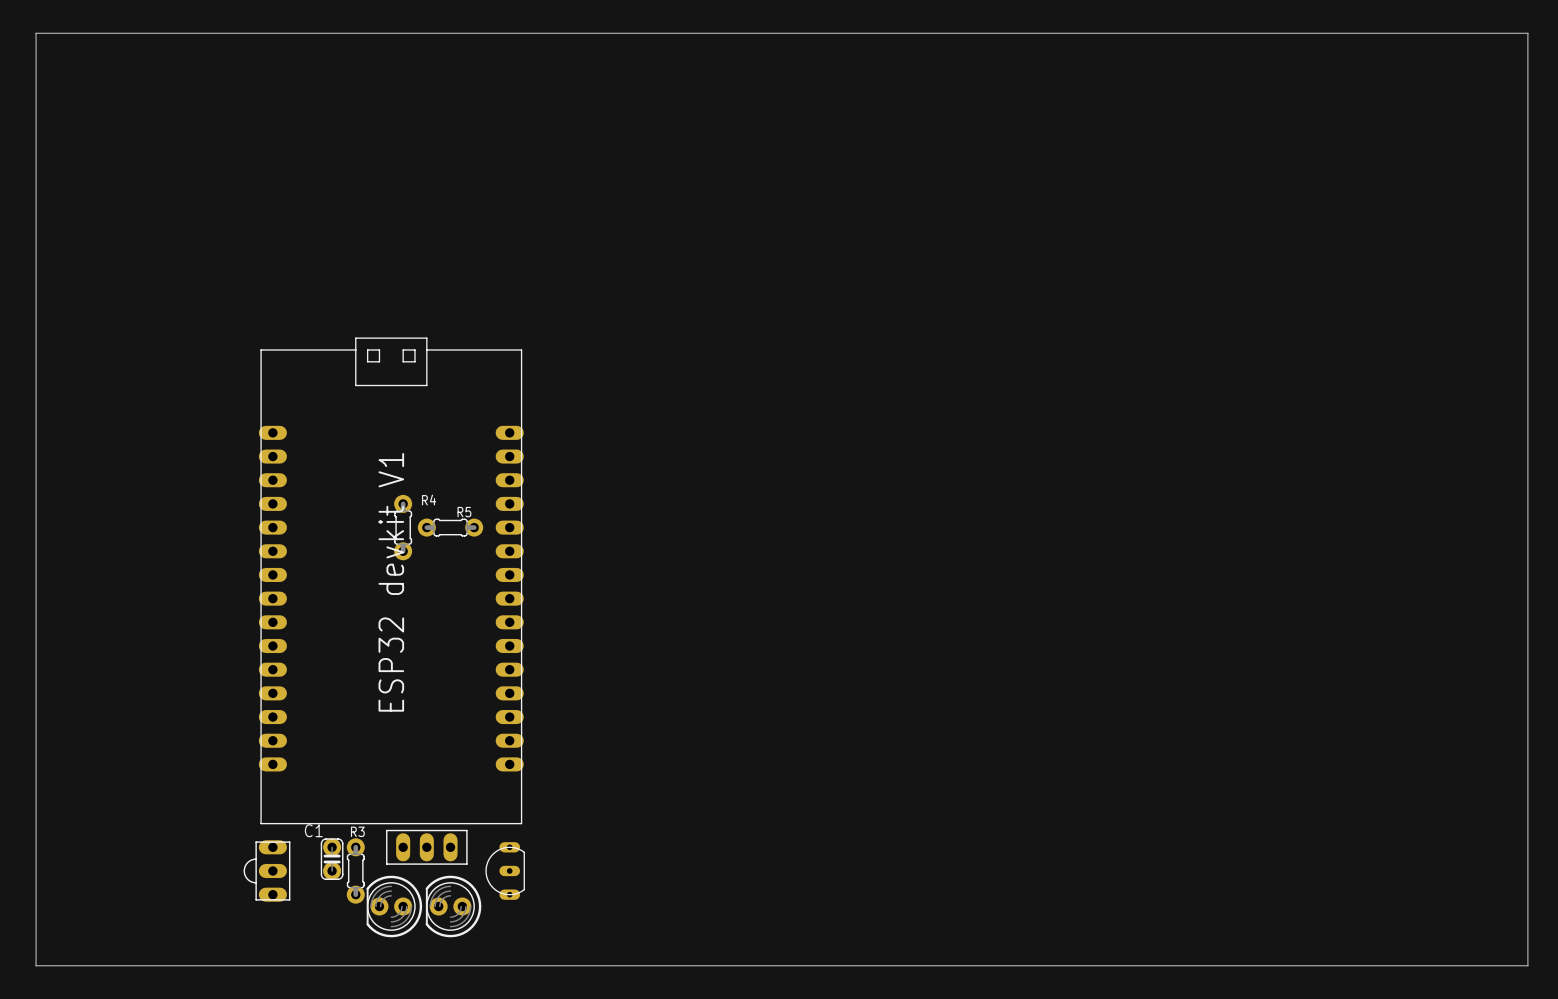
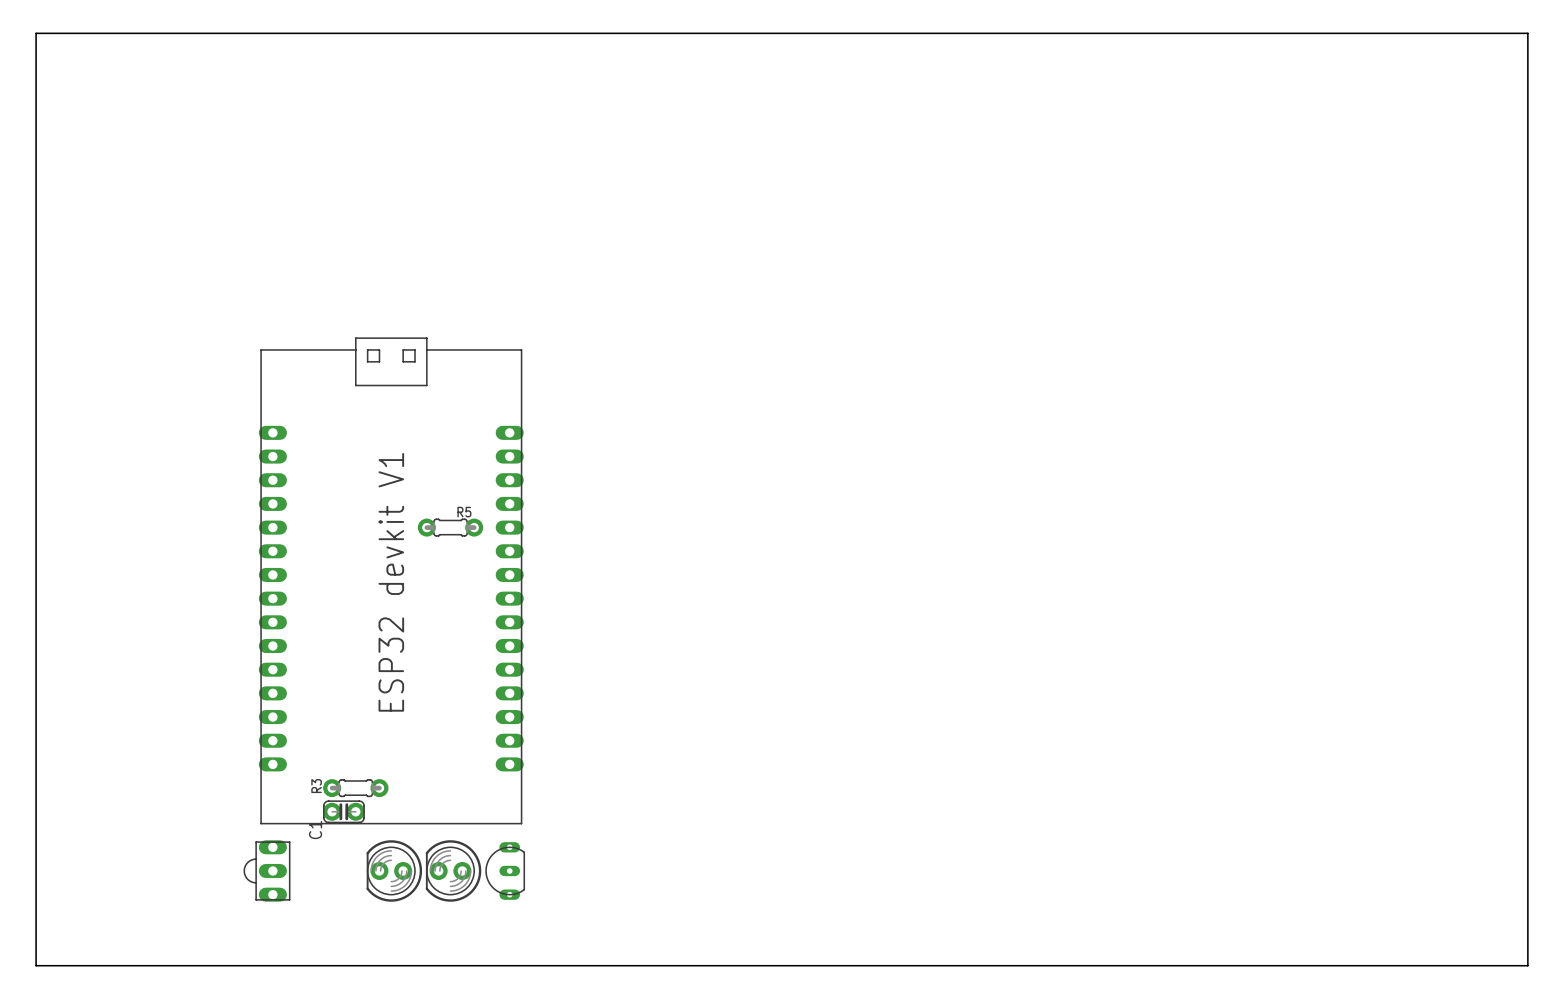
R4: (403, 527) -> none
R3 name position: R3 (357, 831) -> R3 (316, 786)
part: (426, 847) -> none
C1 rotation: 0° (332, 859) -> 90° counterclockwise (343, 811)
C1 position: (332, 859) -> (343, 811)
R3 rotation: 0° (355, 870) -> 90° clockwise (355, 788)
R3 position: (355, 870) -> (355, 788)
part: none -> (394, 870)
part: none -> (453, 870)
part: (394, 906) -> none
part: (453, 906) -> none

